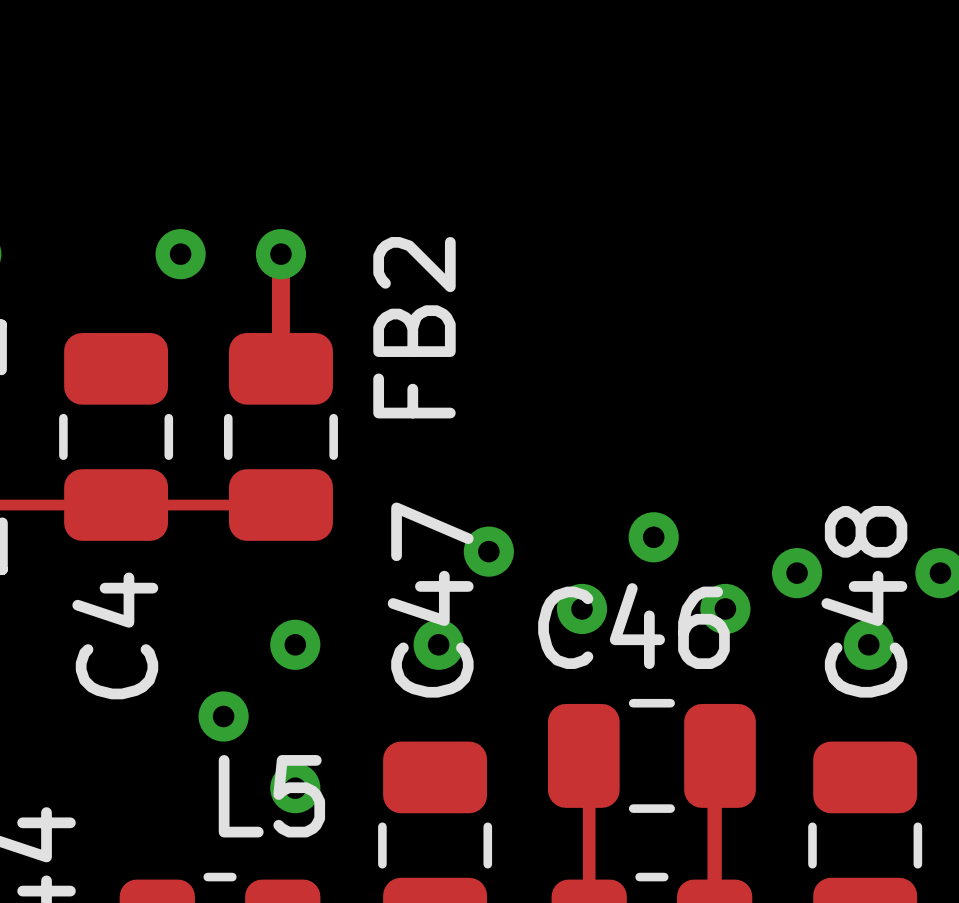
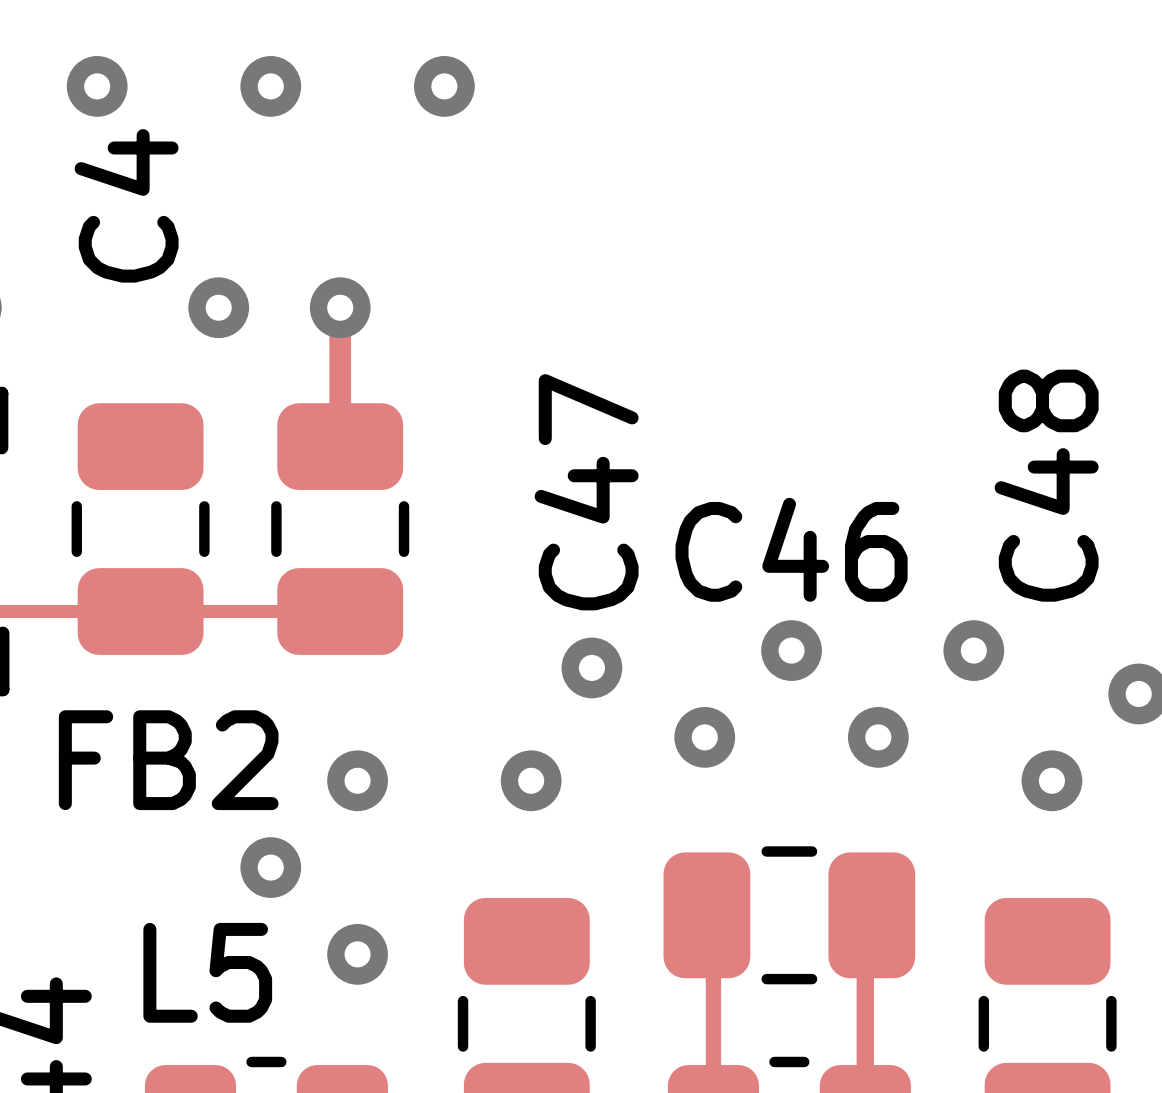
via: none -> (97, 86)
via: none -> (270, 86)
via: none -> (444, 86)
FB2 name rotation: 0° (414, 327) -> 90° clockwise (168, 760)
FB2 name position: FB2 (414, 327) -> FB2 (168, 760)
via position: (797, 573) -> (973, 650)
C47 name position: C47 (430, 600) -> C47 (586, 492)
C48 name position: C48 (864, 601) -> C48 (1046, 485)
C46 name position: C46 (634, 626) -> C46 (791, 549)
C4 name position: C4 (115, 635) -> C4 (126, 205)
L5 name position: L5 (271, 796) -> L5 (207, 972)

